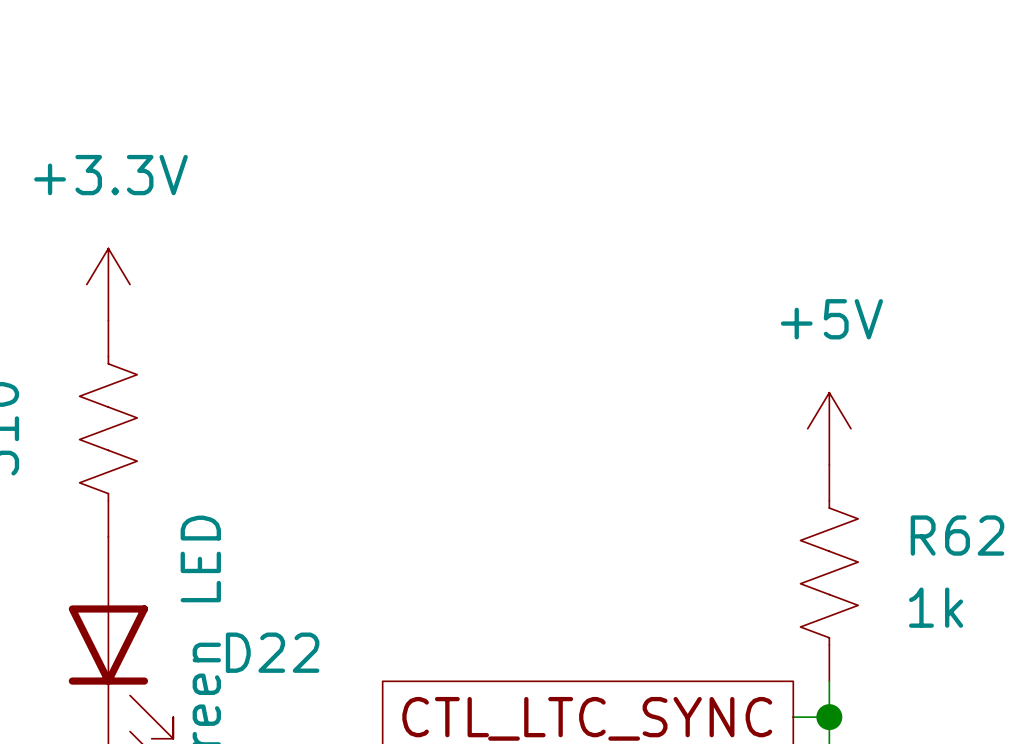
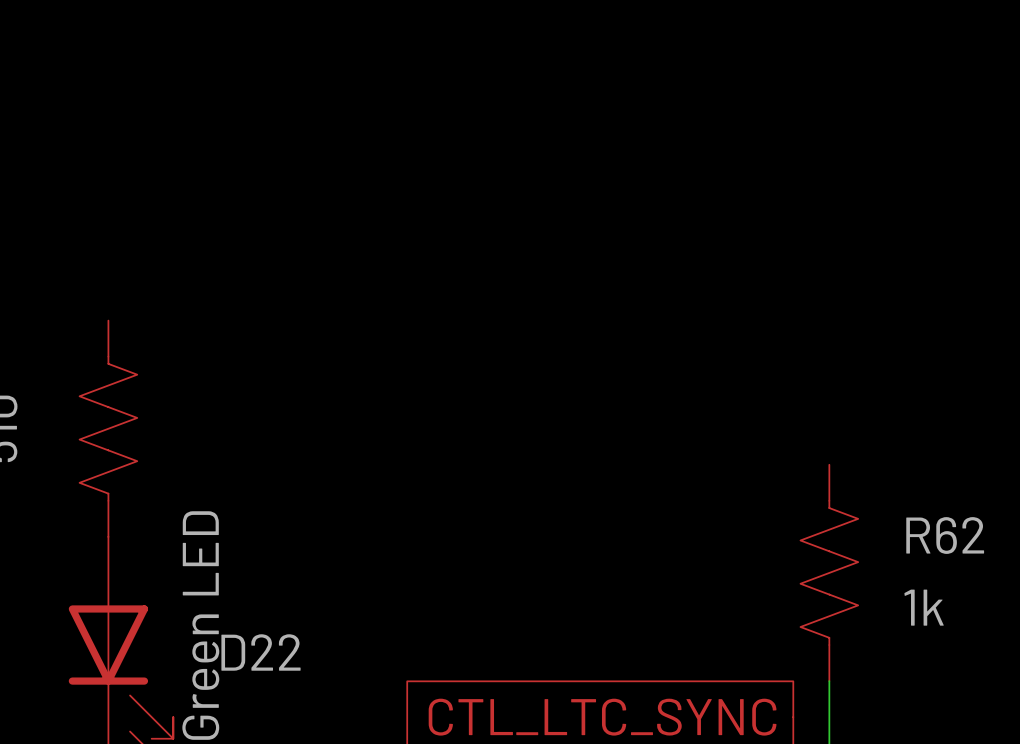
power symbol: +3.3V (108, 284) -> none
power symbol: +5V (829, 428) -> none
wire: (793, 717) (829, 717) -> none
junction: (829, 717) -> none

